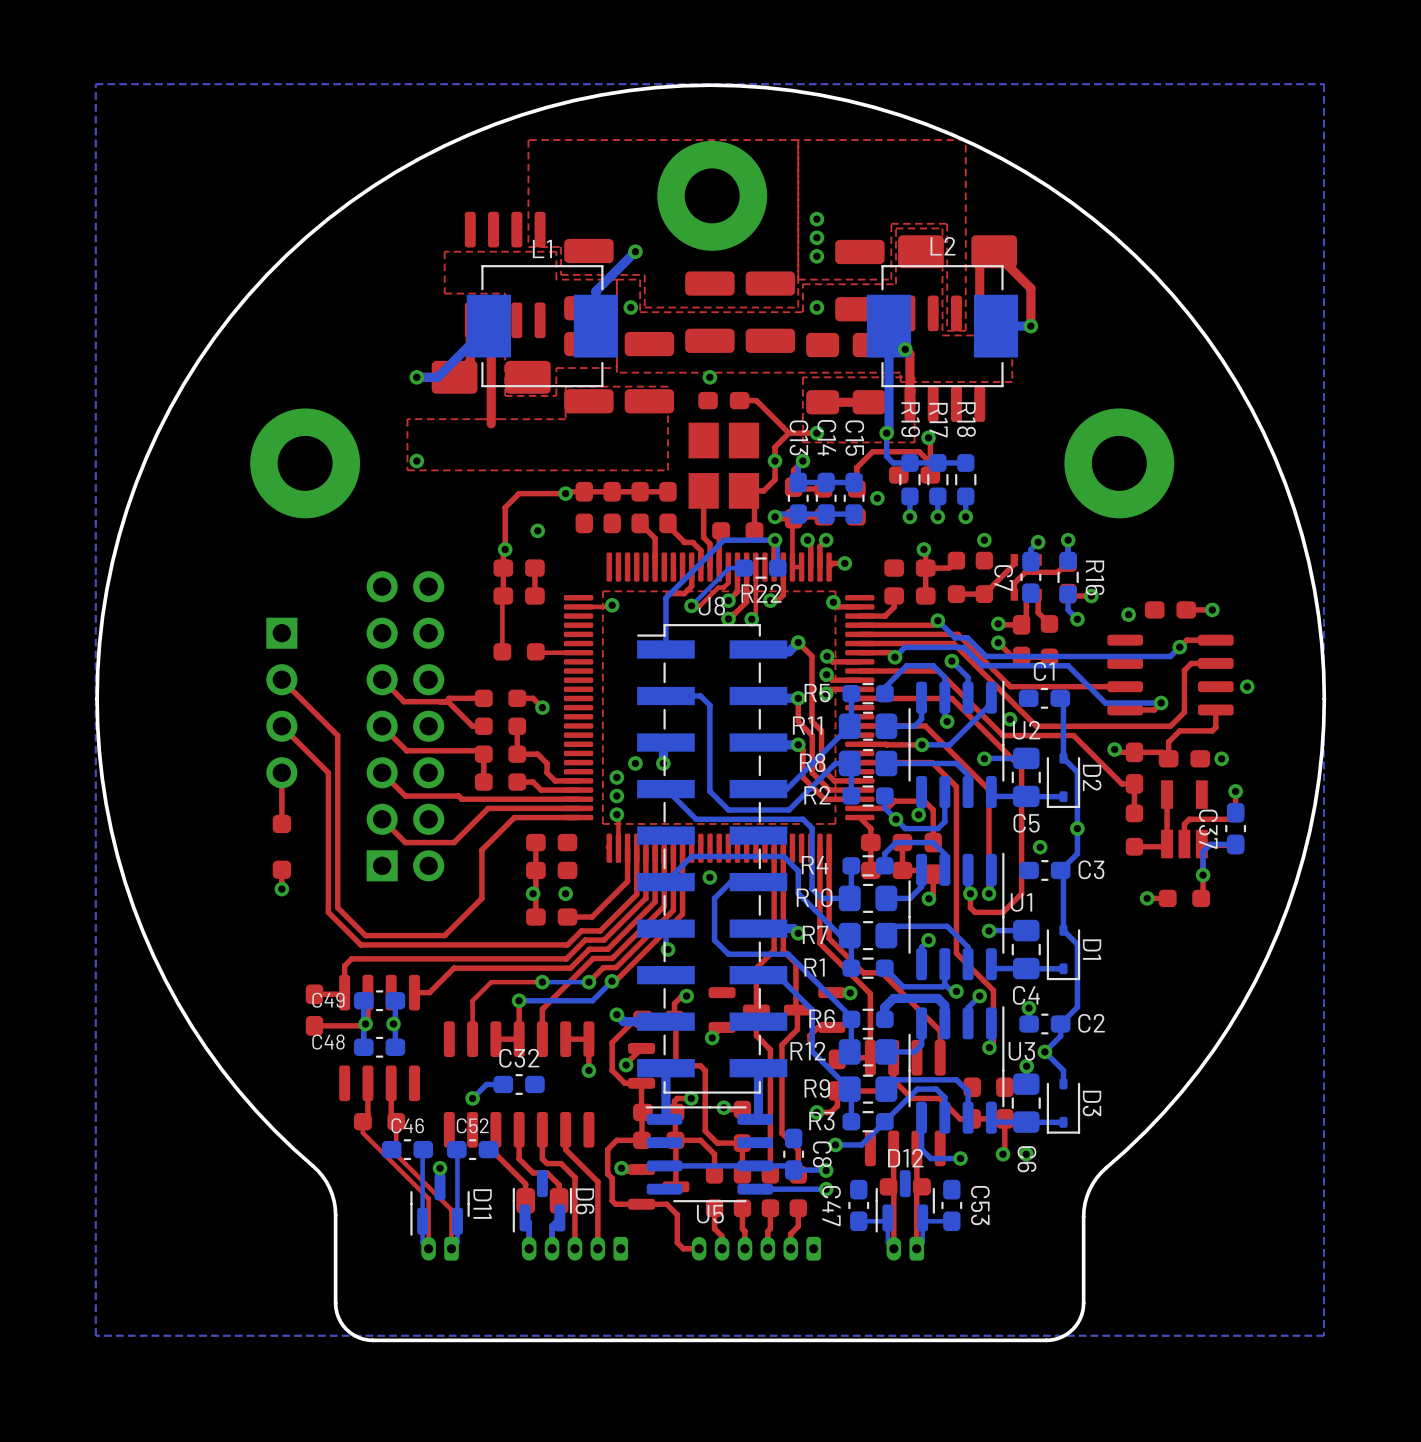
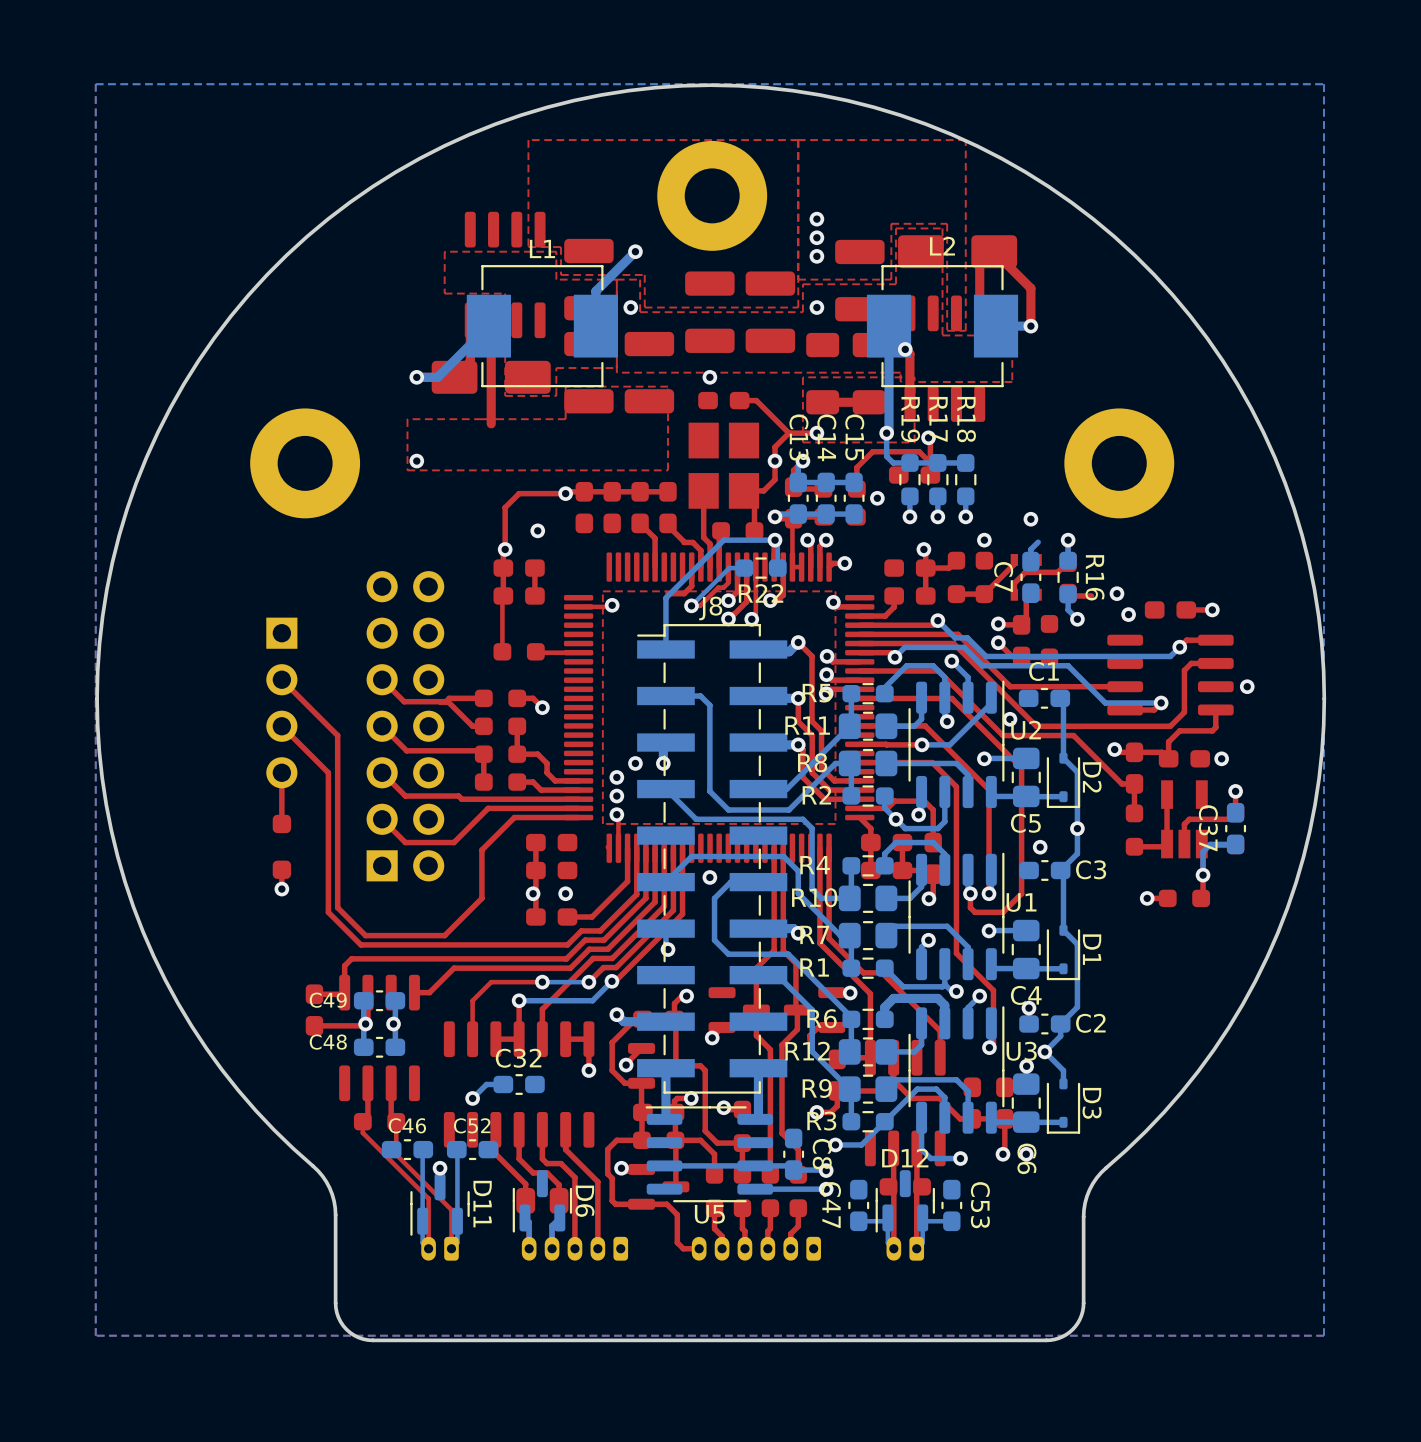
via position: (1038, 542) -> (1030, 519)
top track: (1038, 594) (1038, 612) (1049, 623) -> none
via position: (1091, 595) -> (1116, 593)

